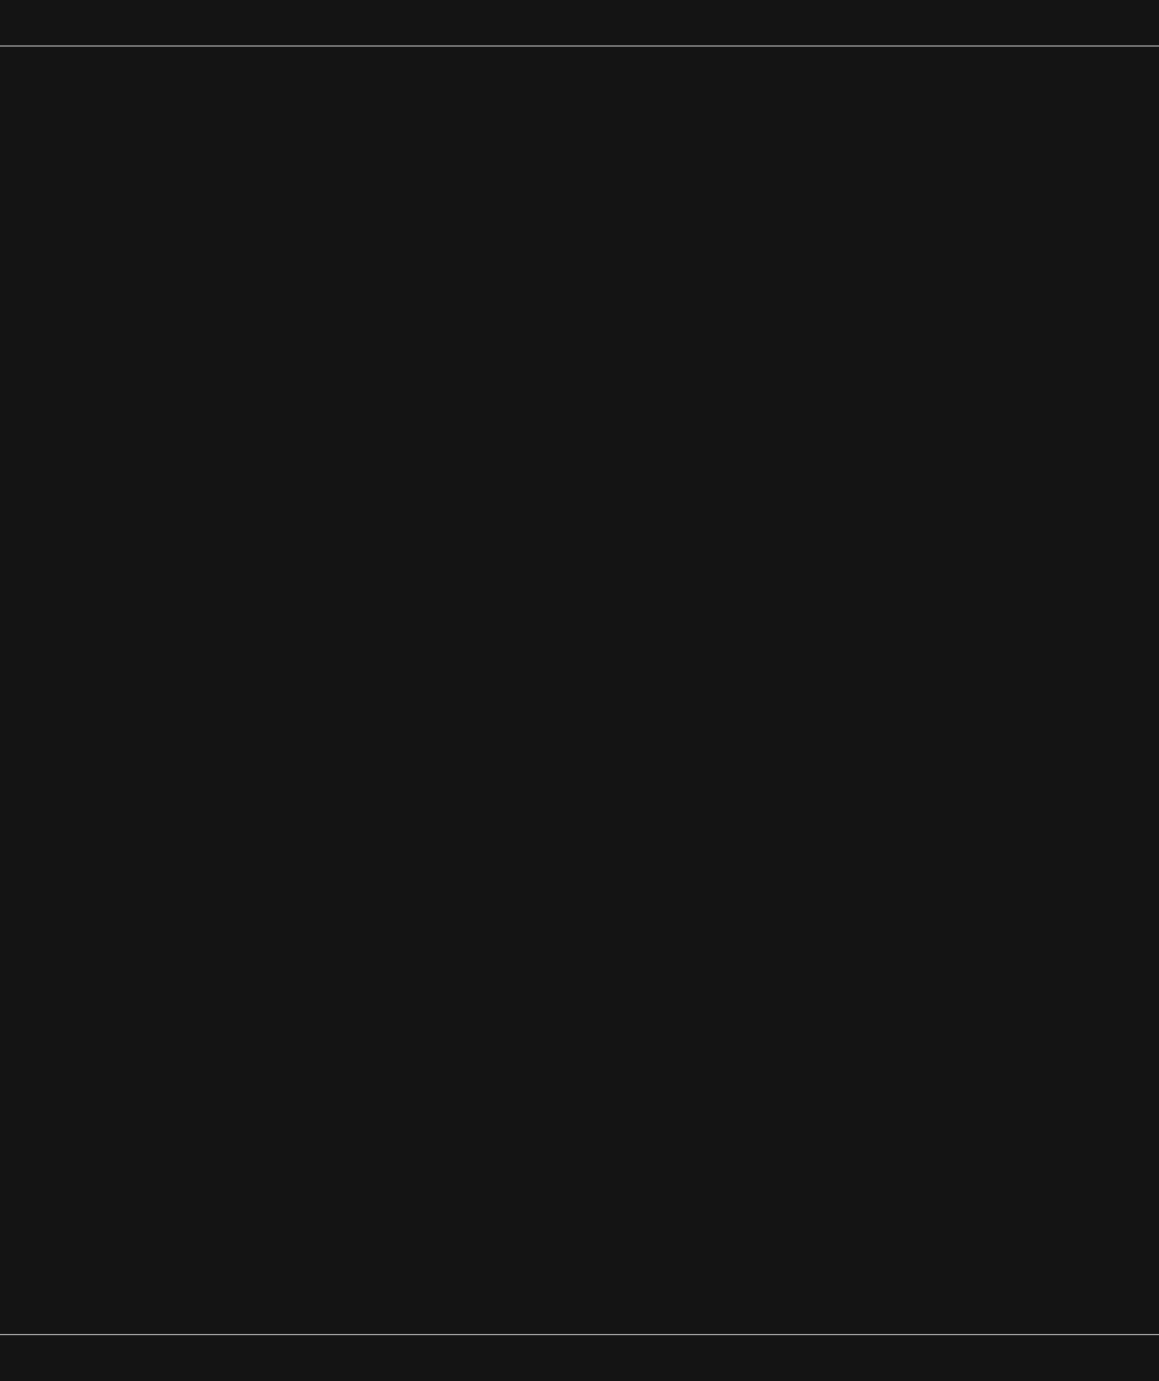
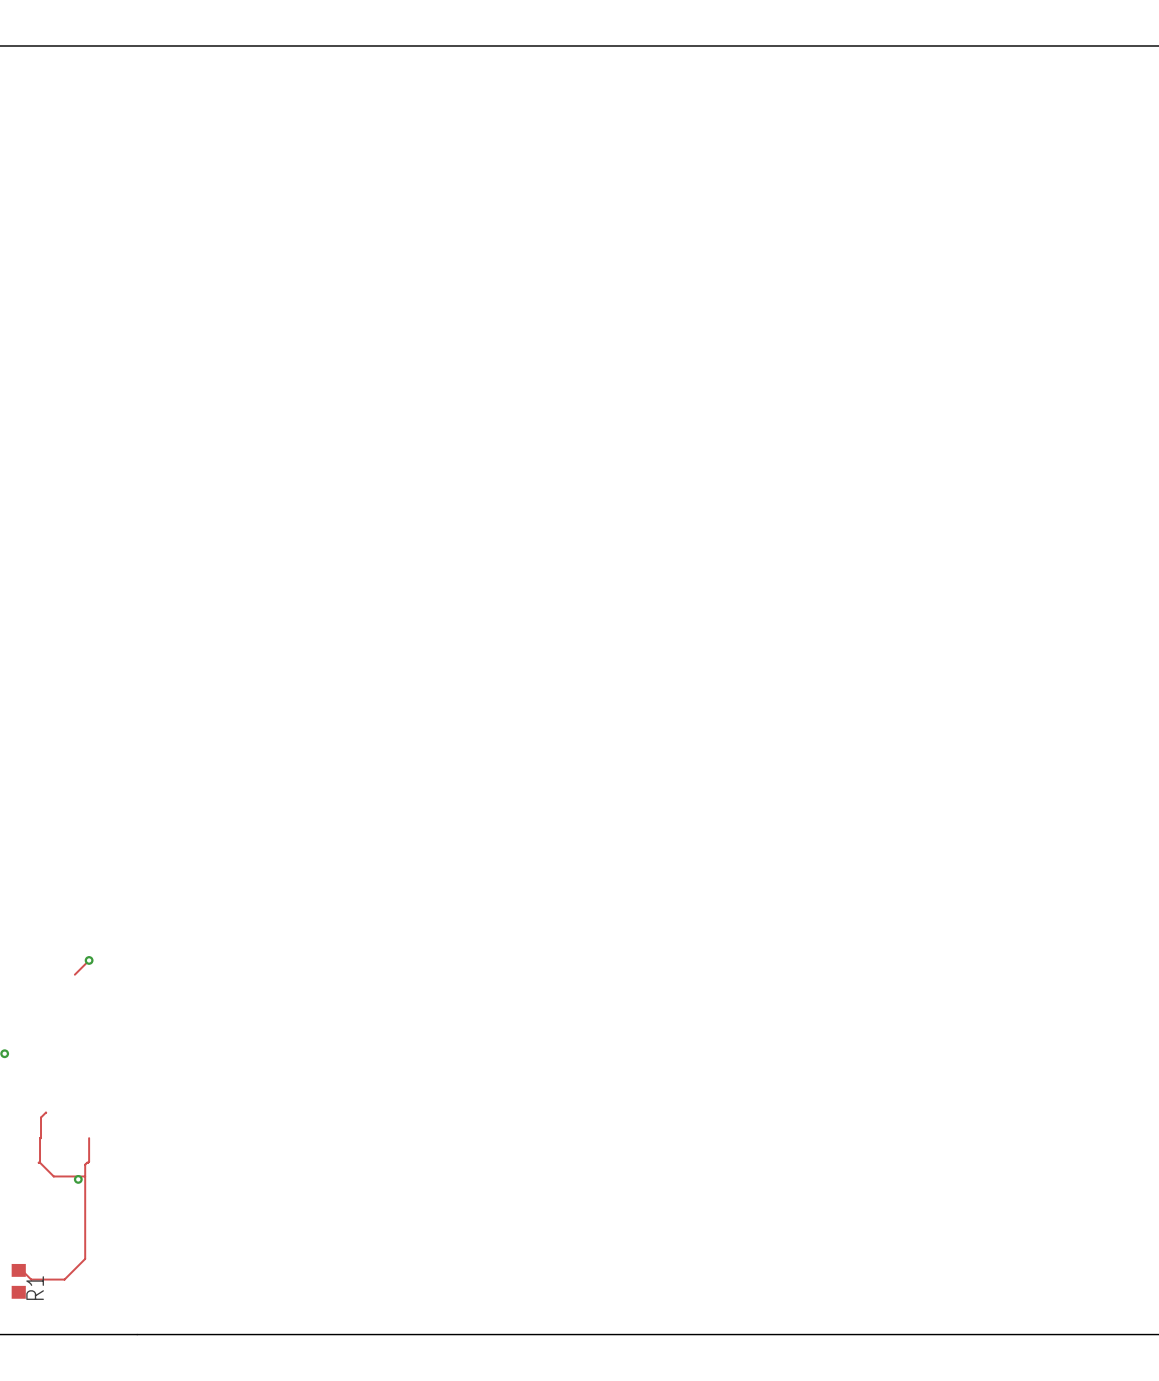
track: none -> (89, 960) (74, 974)
via: none -> (89, 960)
via: none -> (4, 1053)
track: none -> (46, 1112) (41, 1117) (39, 1162)
track: none -> (89, 1138) (89, 1161) (85, 1164) (85, 1258) (64, 1279) (31, 1279) (22, 1270) (18, 1270)
track: none -> (38, 1162) (53, 1176) (85, 1176)
via: none -> (78, 1179)
R1: none -> (18, 1281)

